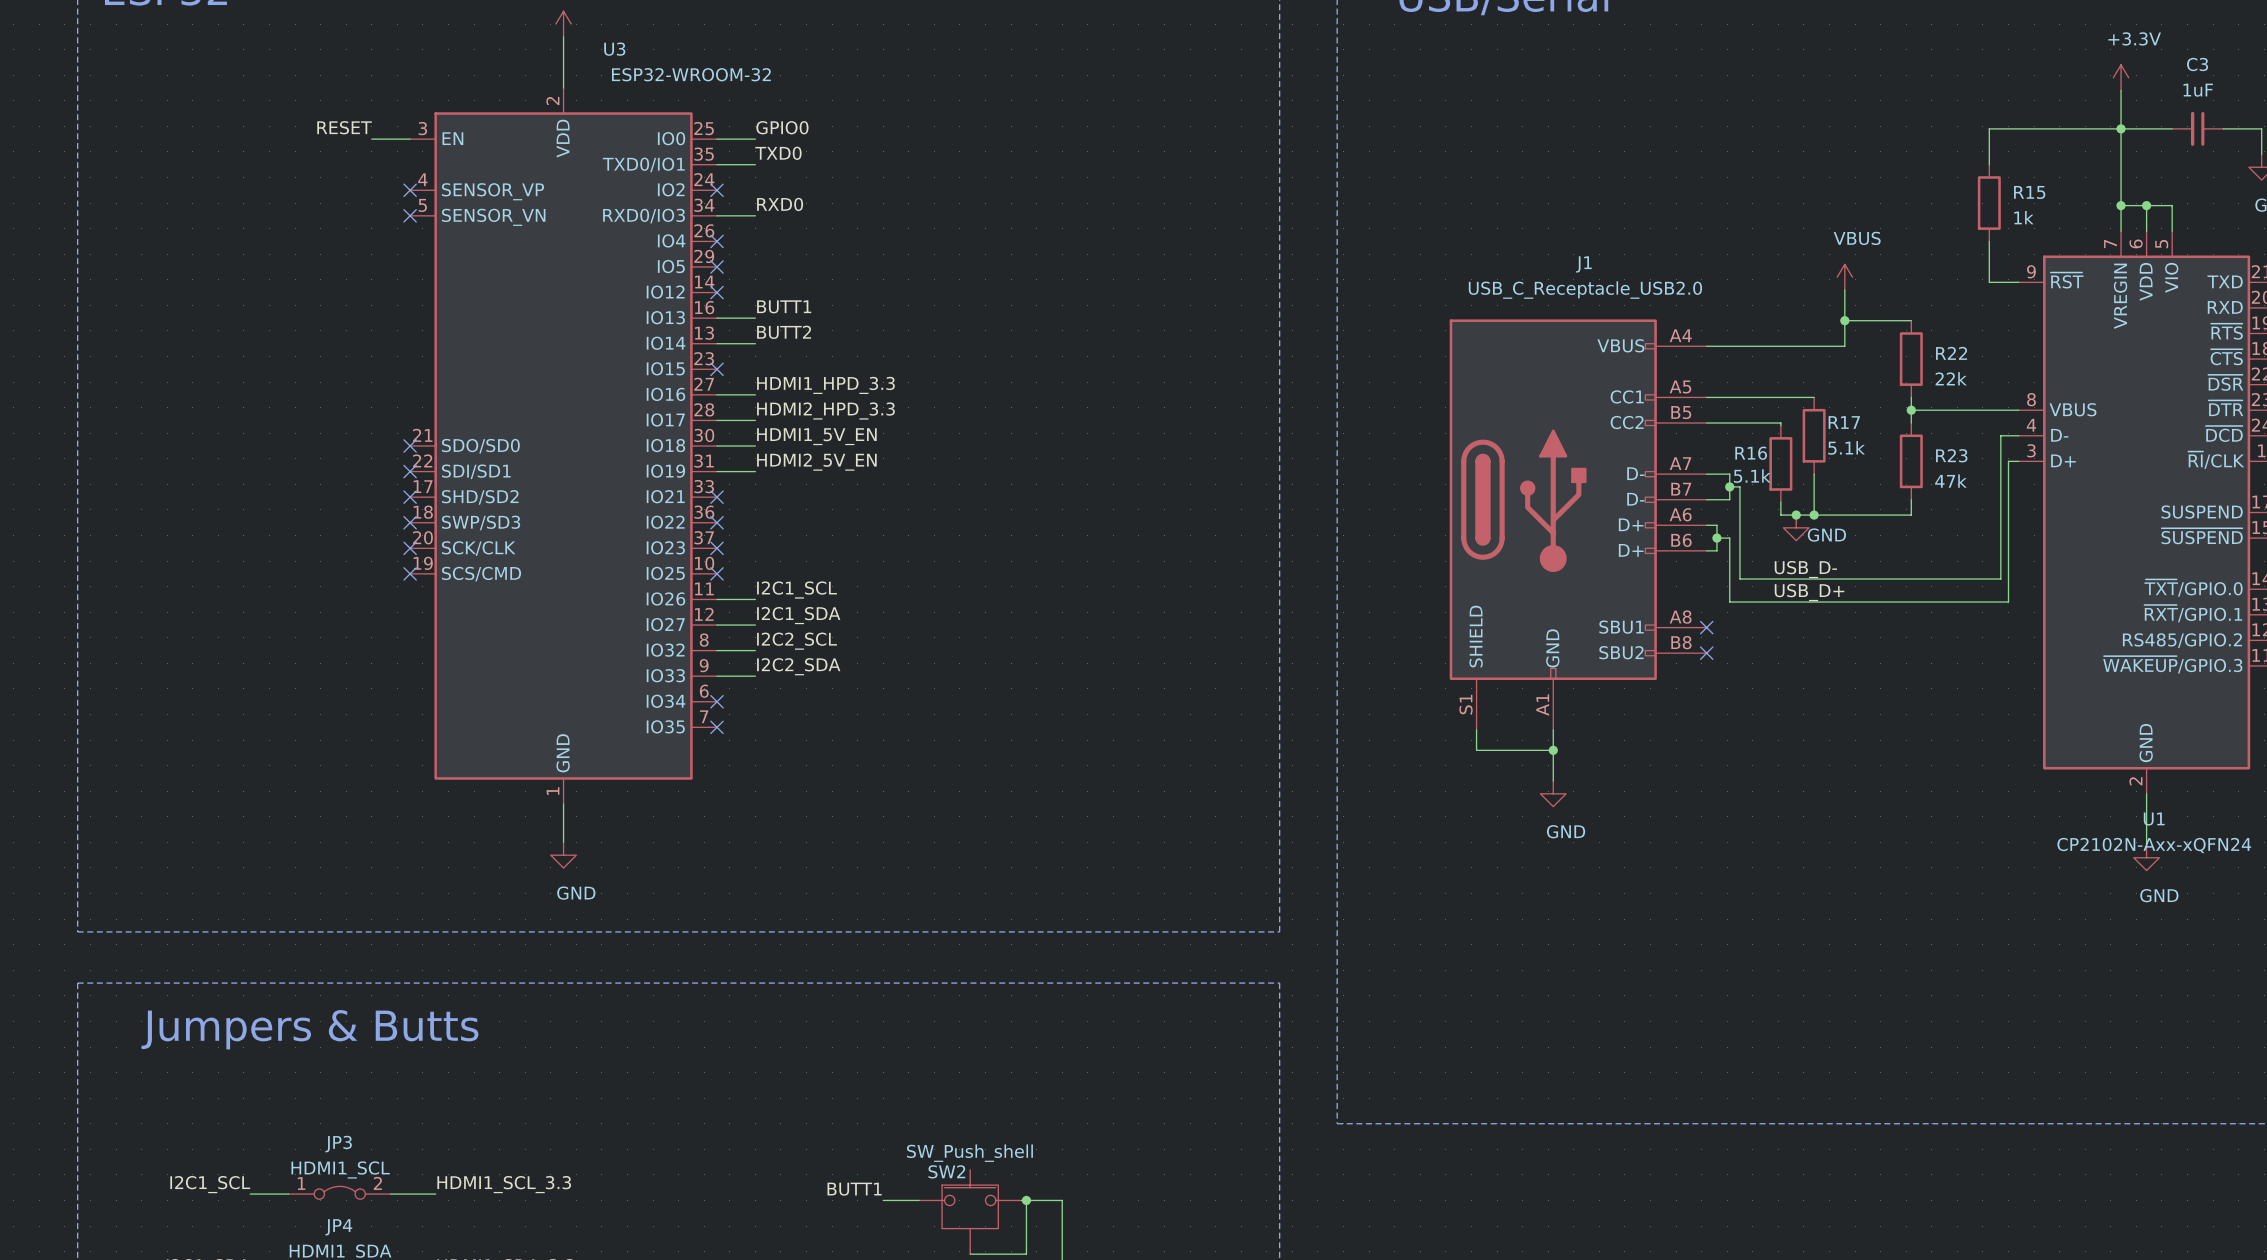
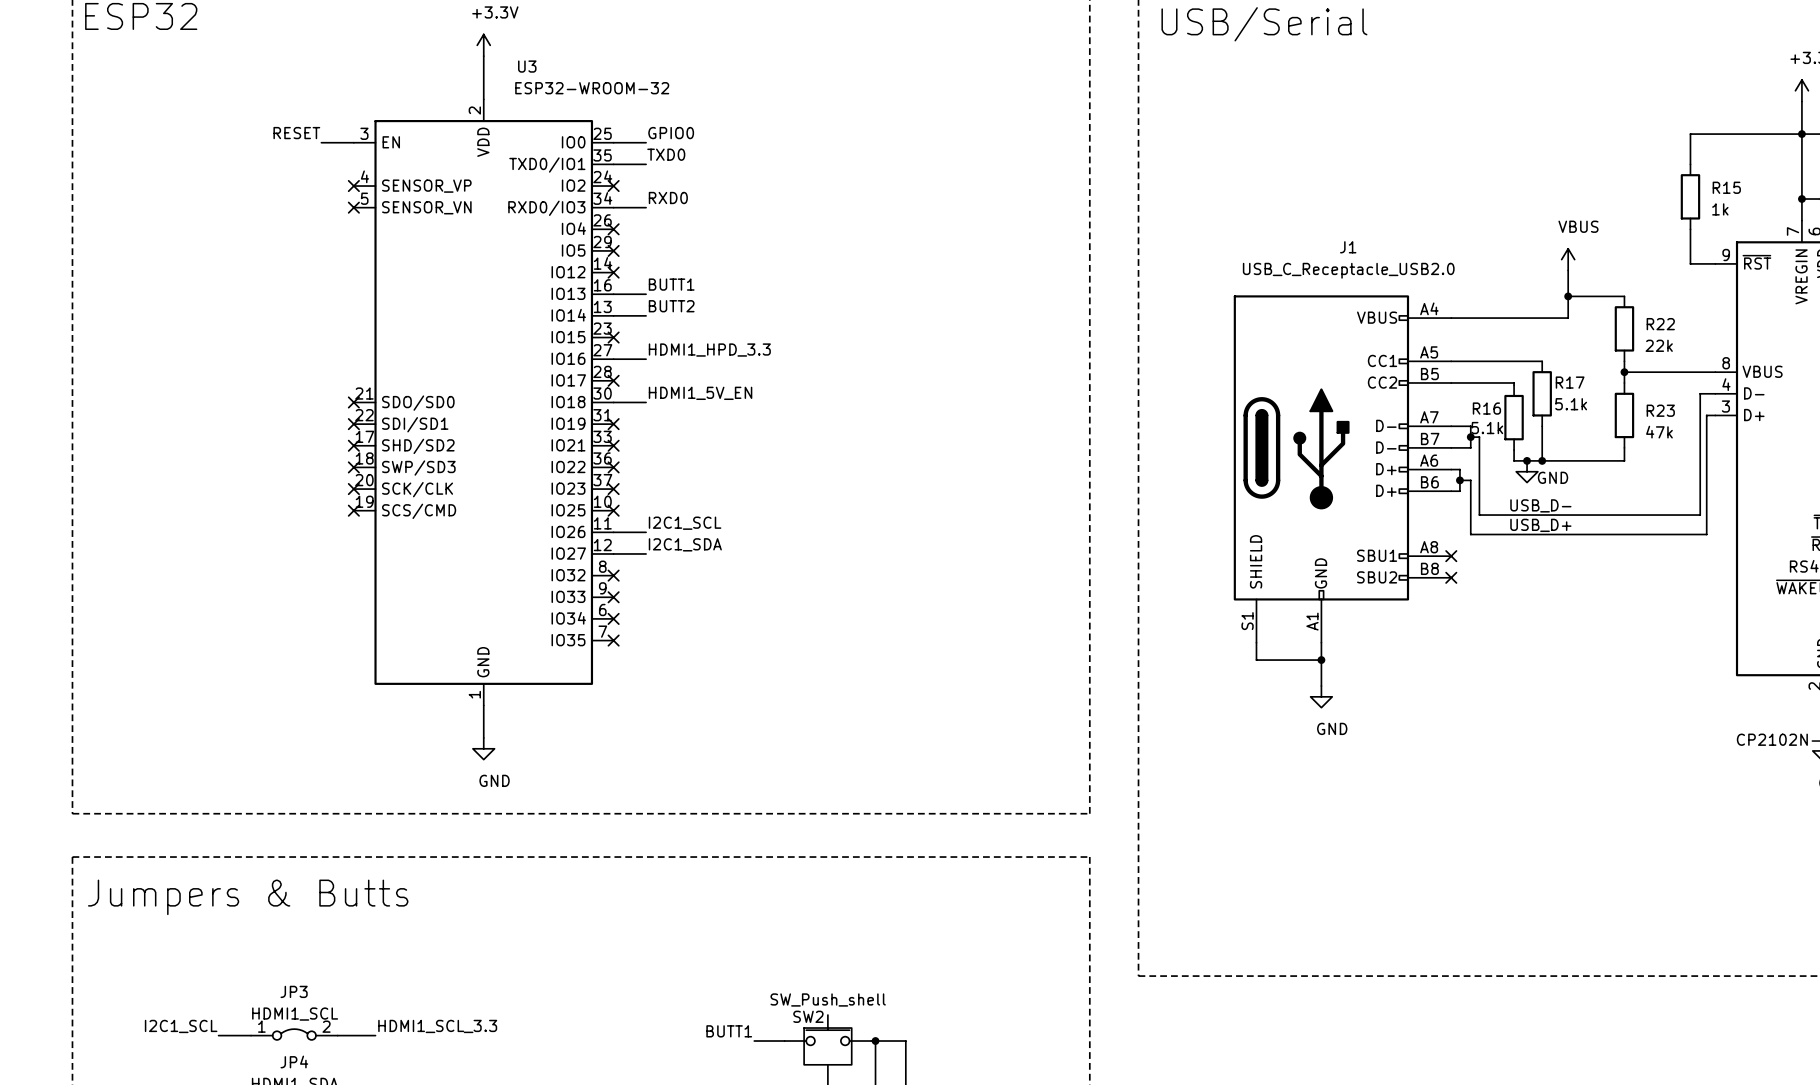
label: HDMI2_HPD_3.3 (825, 410) -> none
wire: (717, 420) (755, 420) -> none
no-connect mark: none -> (613, 380)
label: HDMI2_5V_EN (816, 462) -> none
wire: (717, 471) (755, 471) -> none
no-connect mark: none -> (613, 424)
label: I2C2_SCL (797, 641) -> none
wire: (717, 650) (755, 650) -> none
no-connect mark: none -> (613, 575)
label: I2C2_SDA (798, 666) -> none
wire: (717, 676) (755, 676) -> none
no-connect mark: none -> (613, 597)

